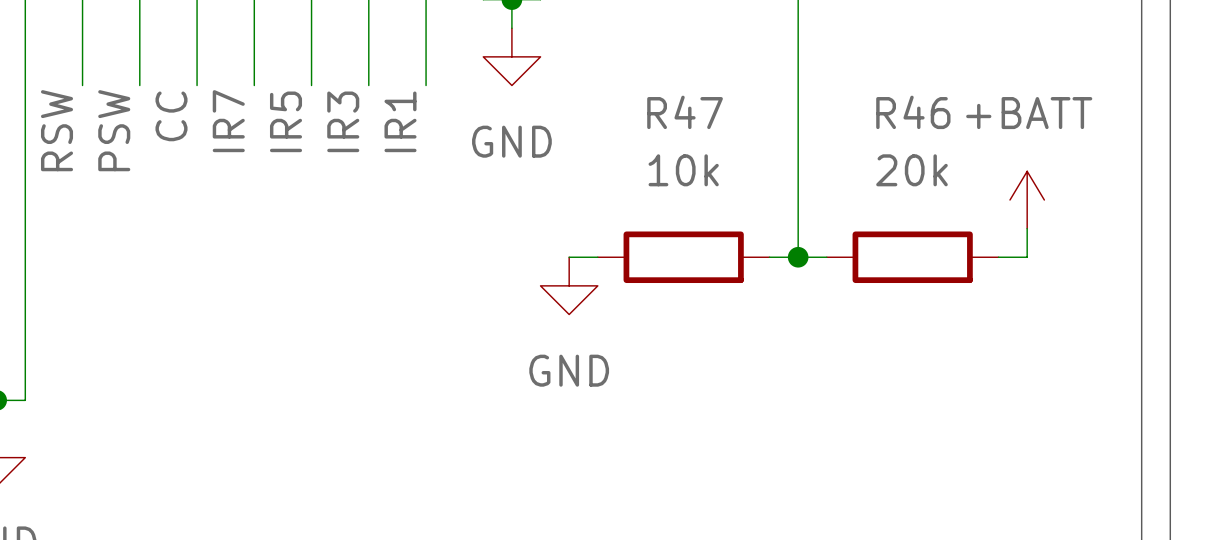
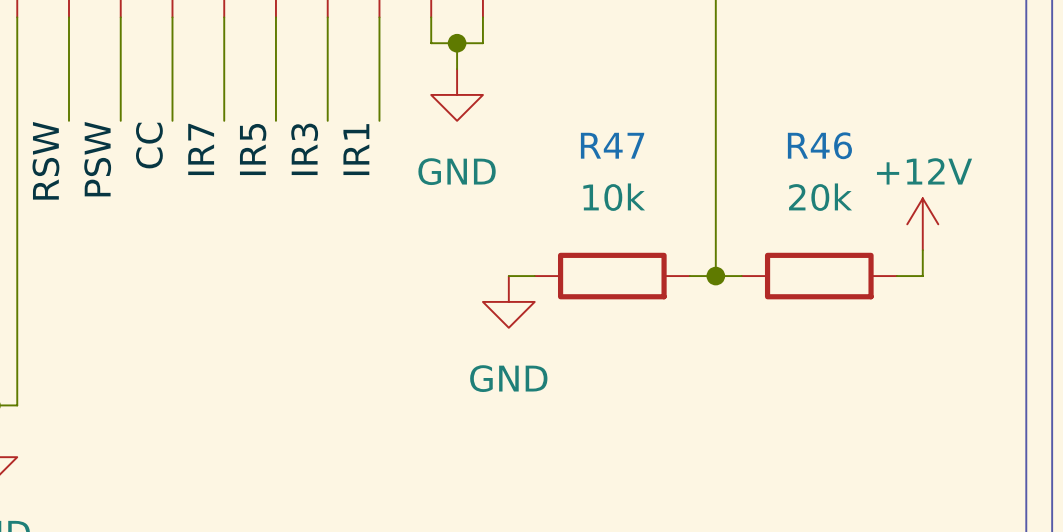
power symbol: +BATT (1027, 200) -> +12V (922, 224)

